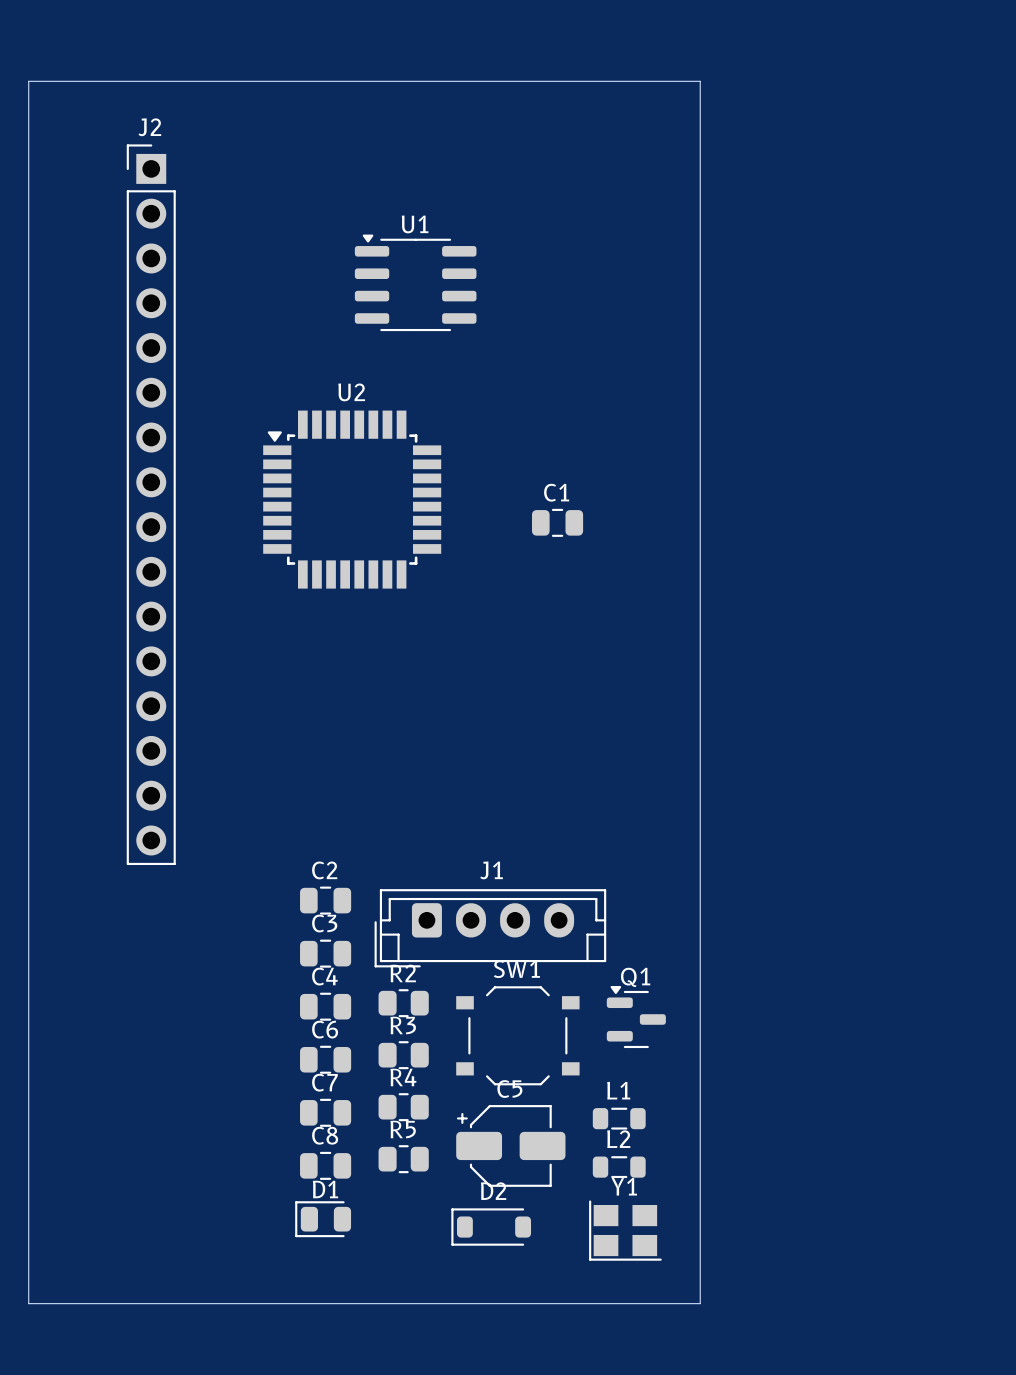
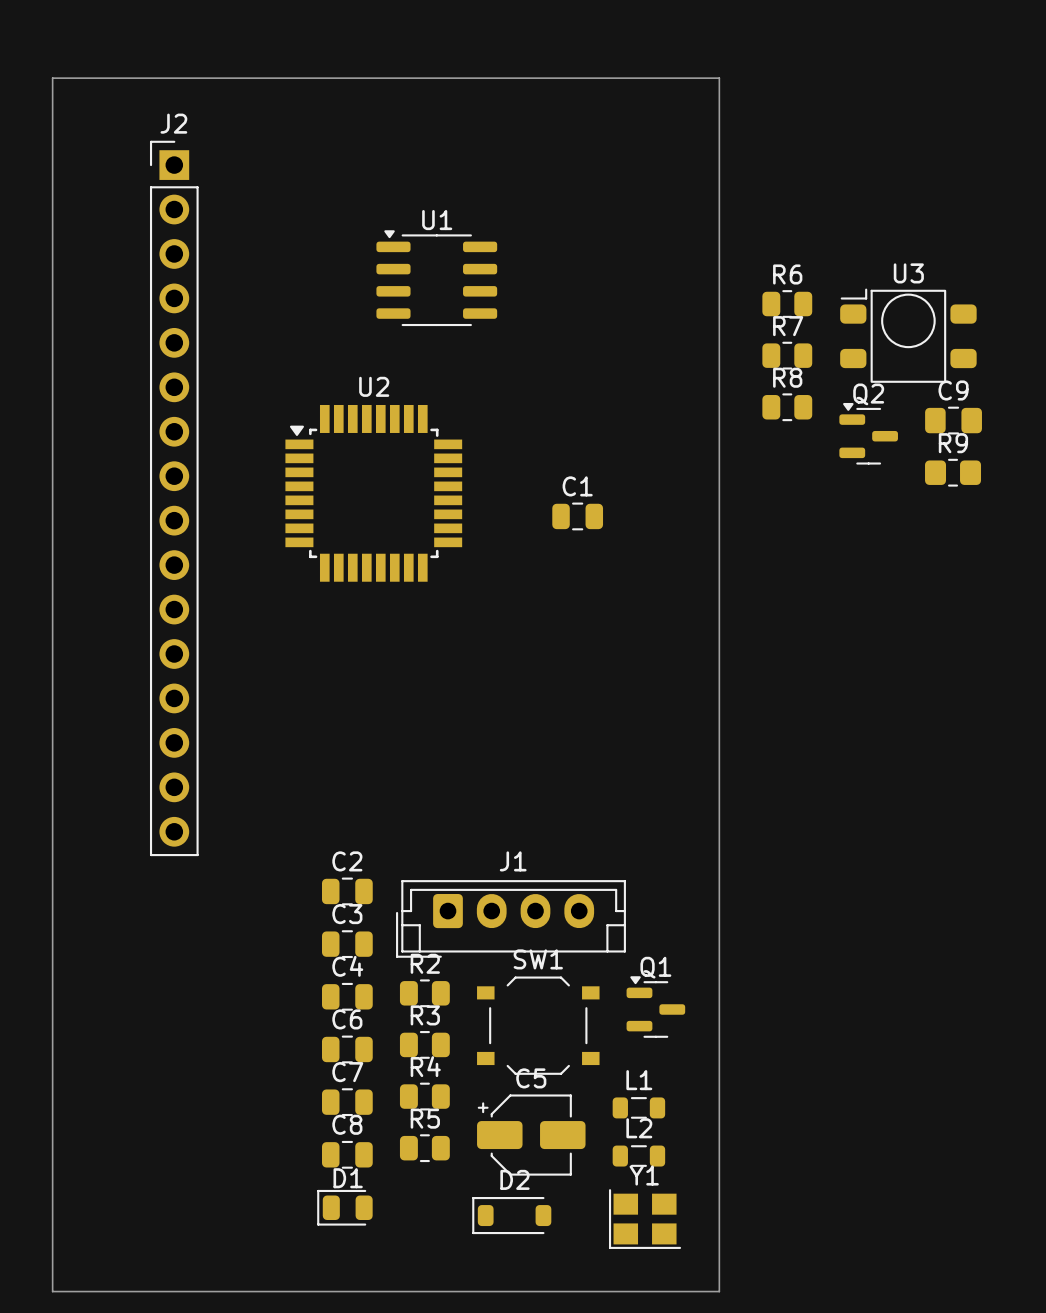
R6: none -> (787, 304)
U3: none -> (908, 335)
R7: none -> (787, 355)
R8: none -> (787, 407)
C9: none -> (953, 420)
Q2: none -> (868, 433)
R9: none -> (953, 472)

